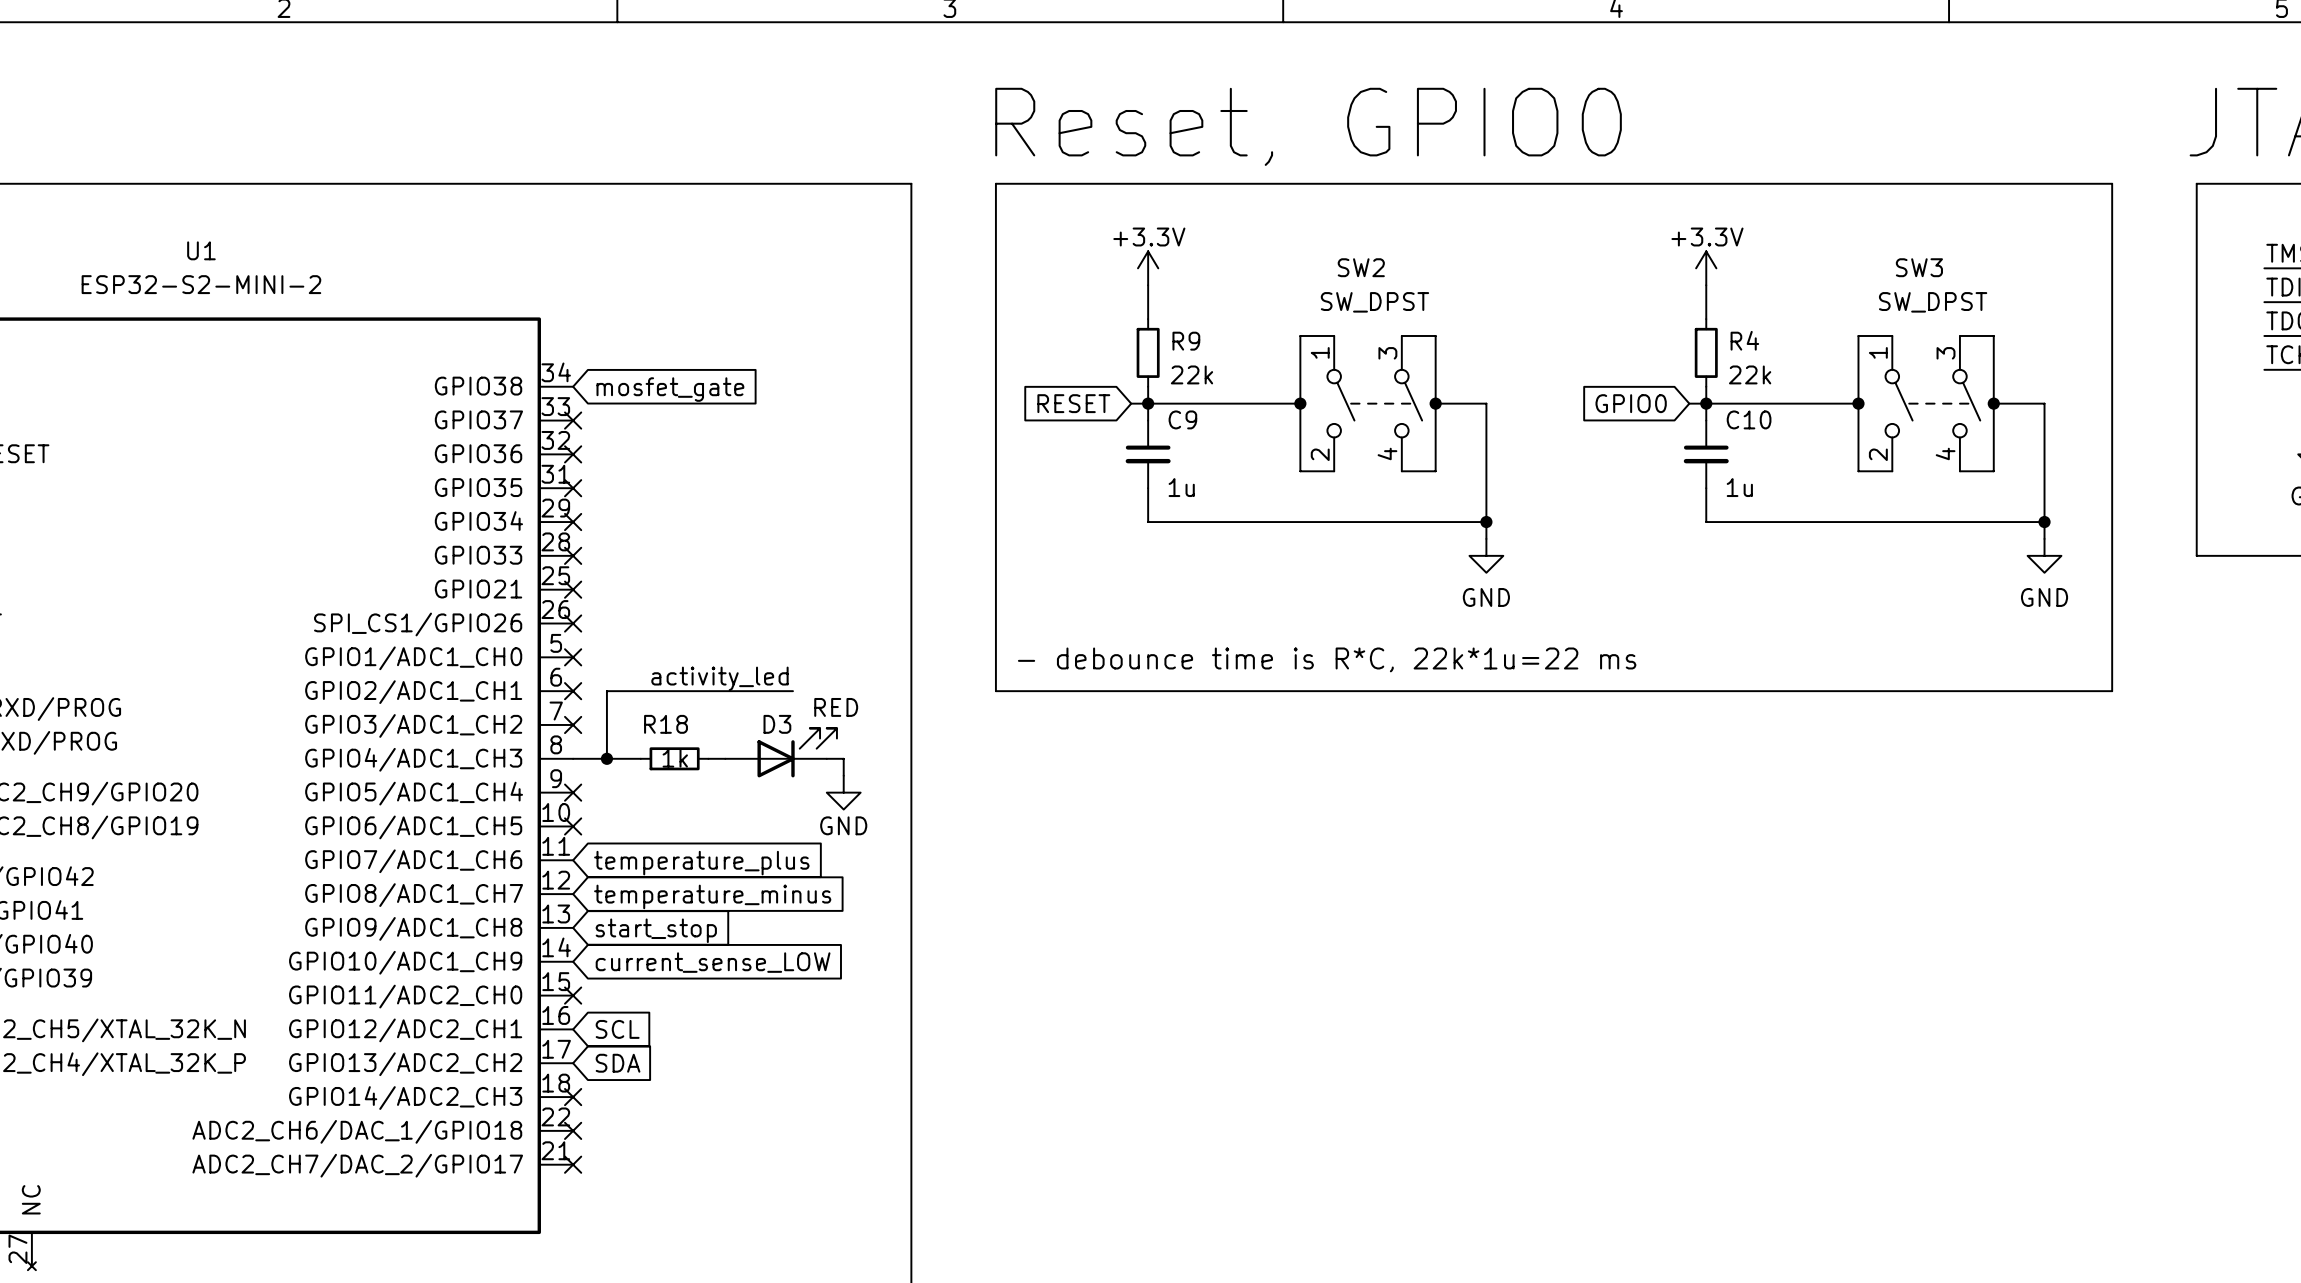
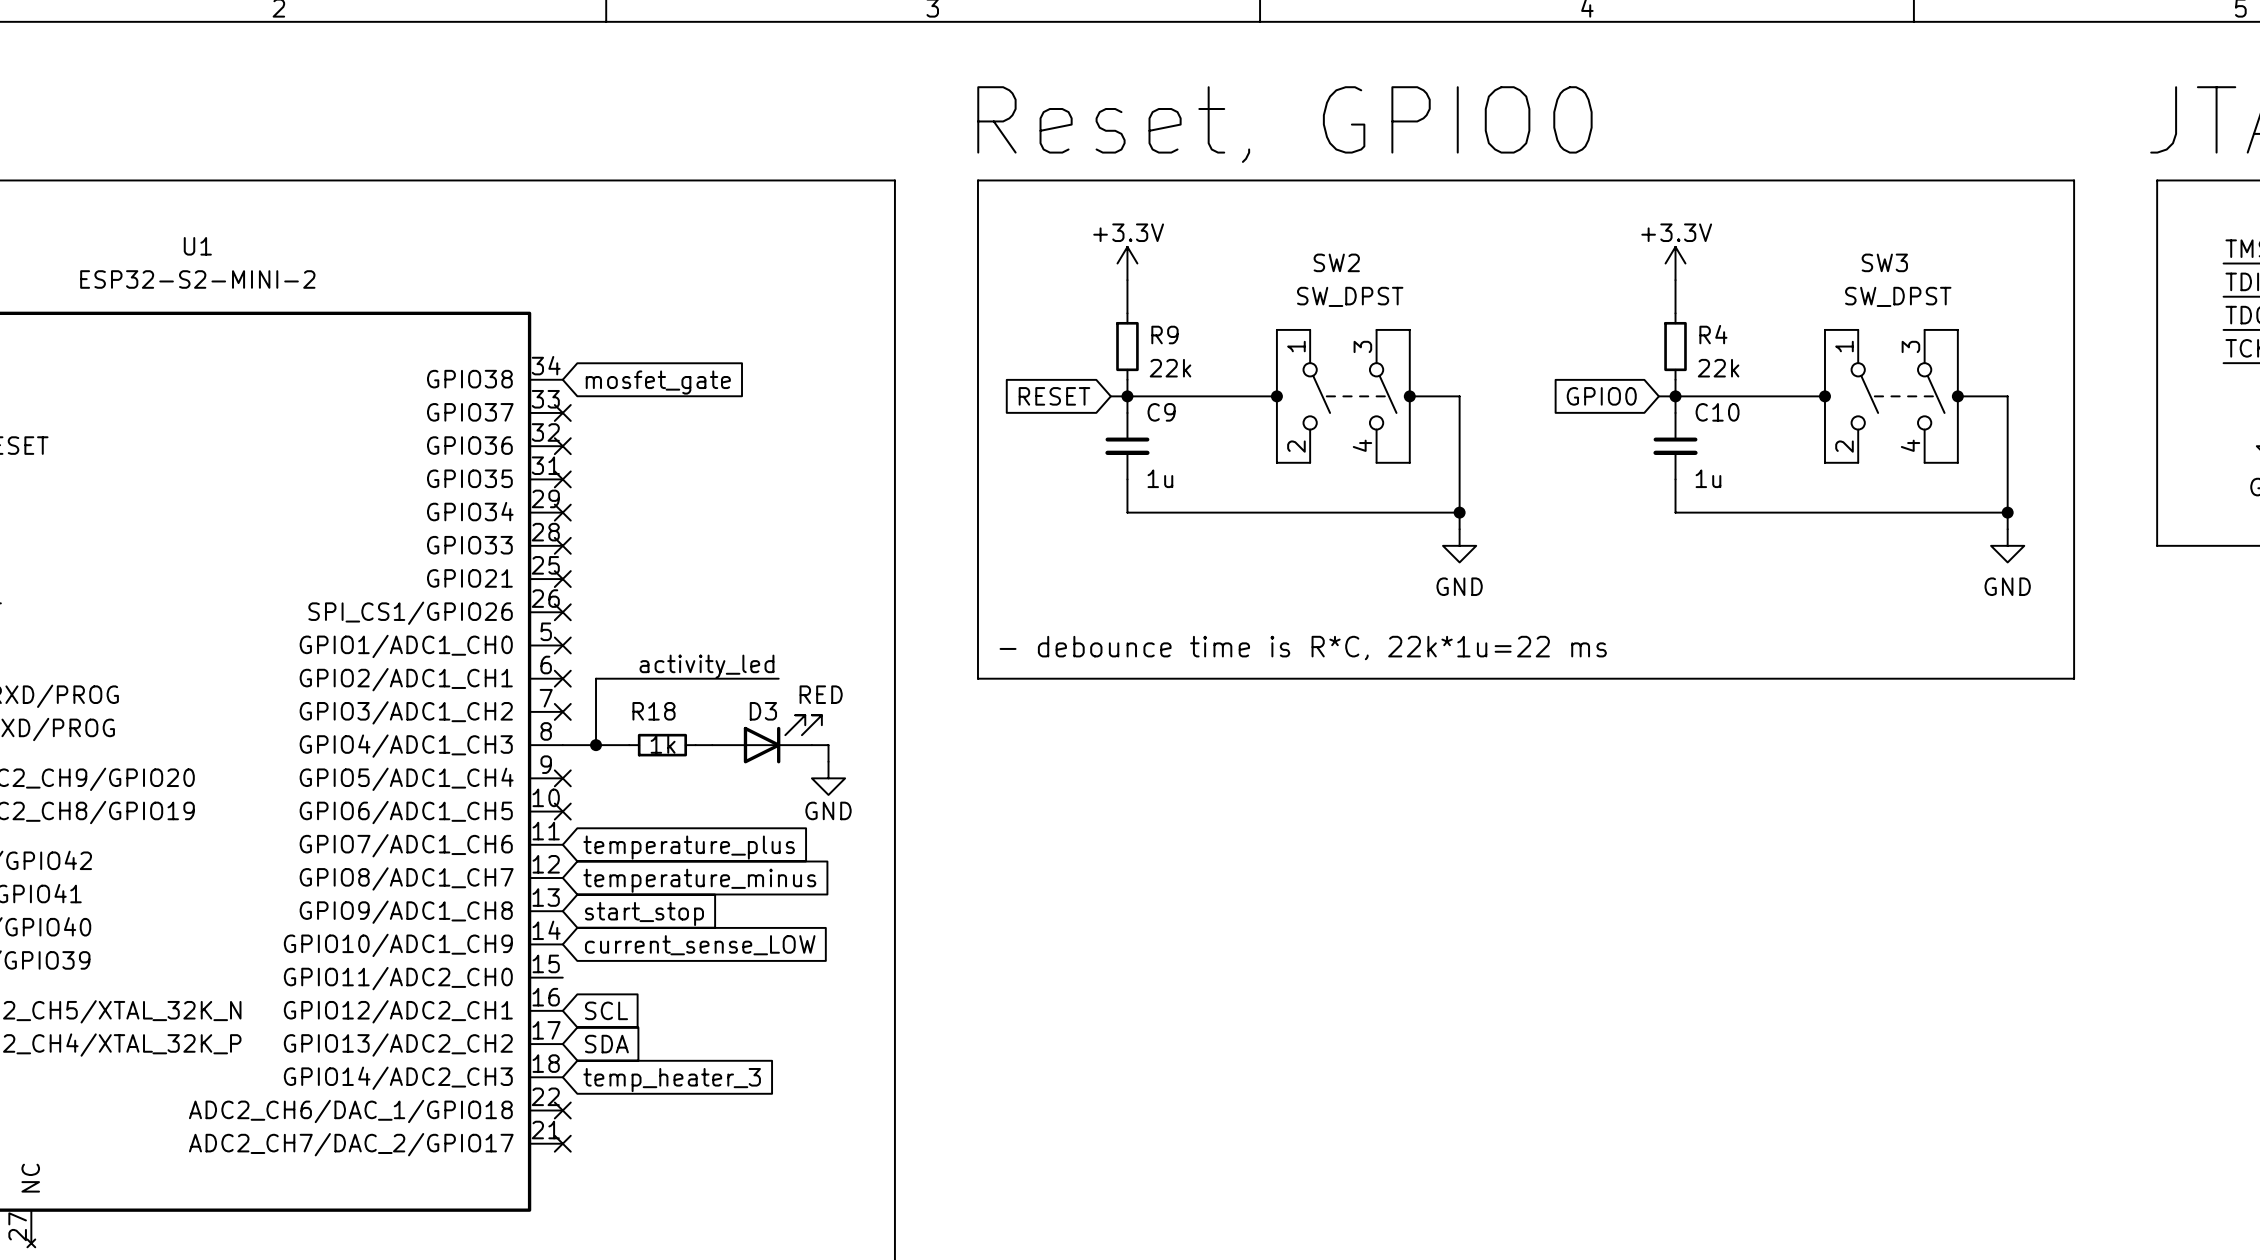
no-connect mark: (573, 995) -> none
no-connect mark: (573, 1097) -> none
global label: none -> temp_heater_3 (672, 1080)

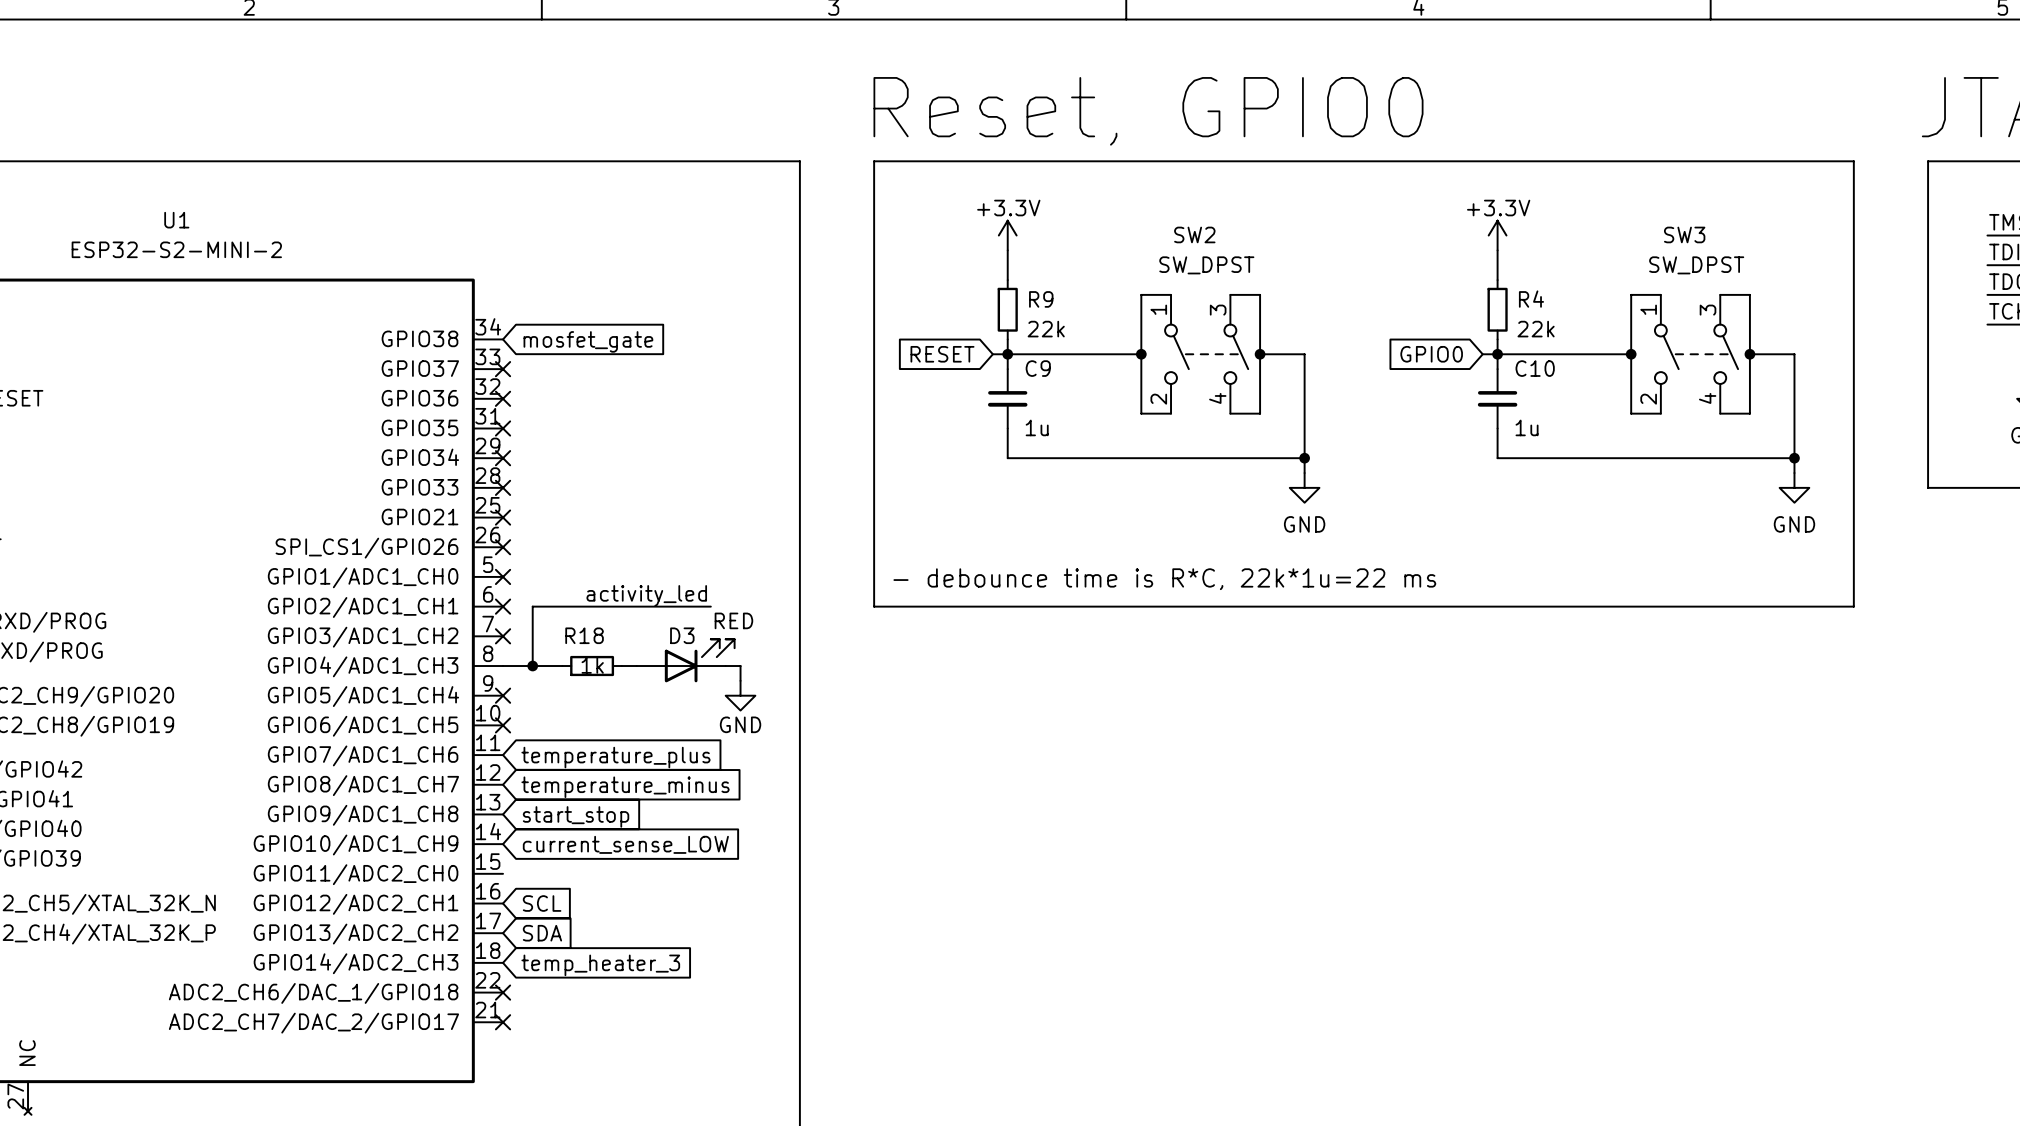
label position: activity_led (706, 666) -> activity_led (646, 595)
wire: none -> (696, 606) (710, 606)

